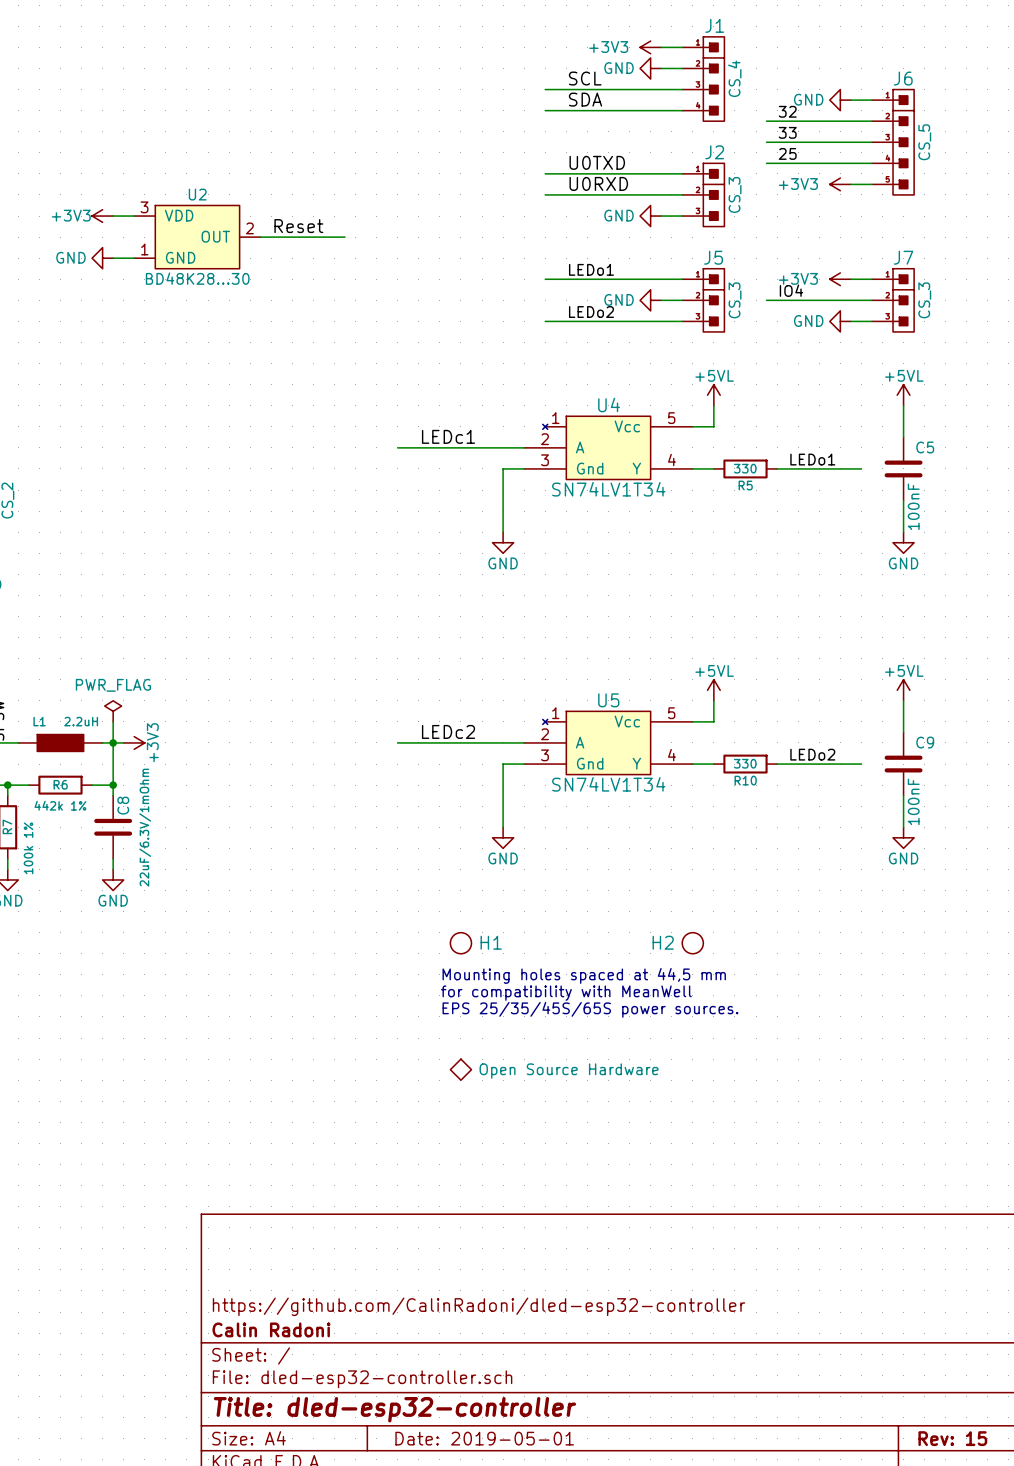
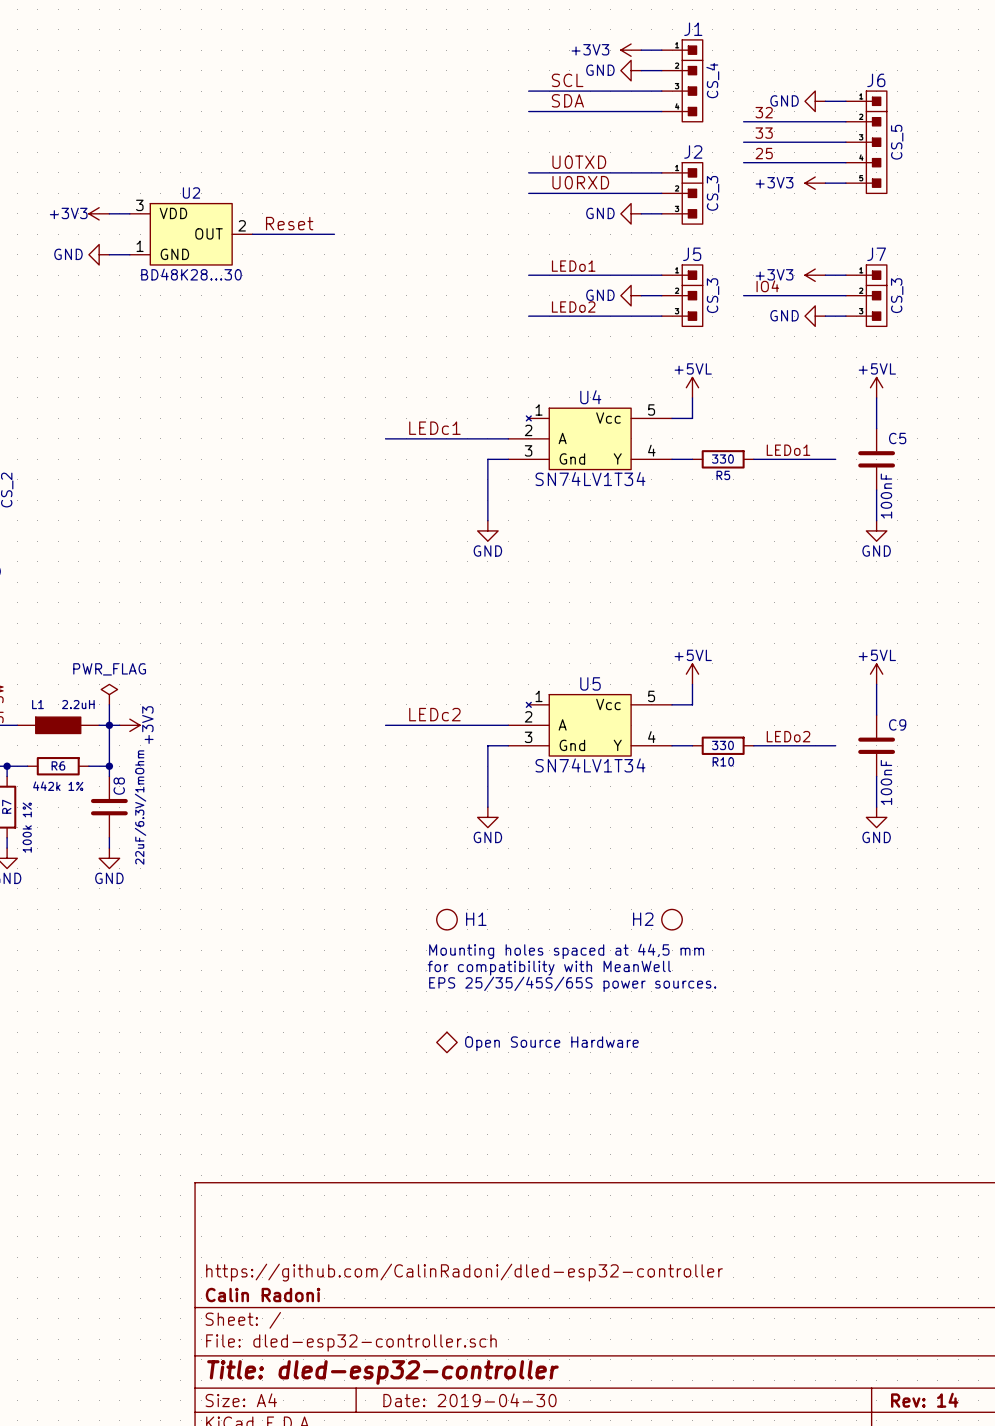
title block: Date: 2019-05-01 (484, 1438) -> Date: 2019-04-30 (469, 1400)
title block: Rev: 15 (952, 1438) -> Rev: 14 (924, 1400)

